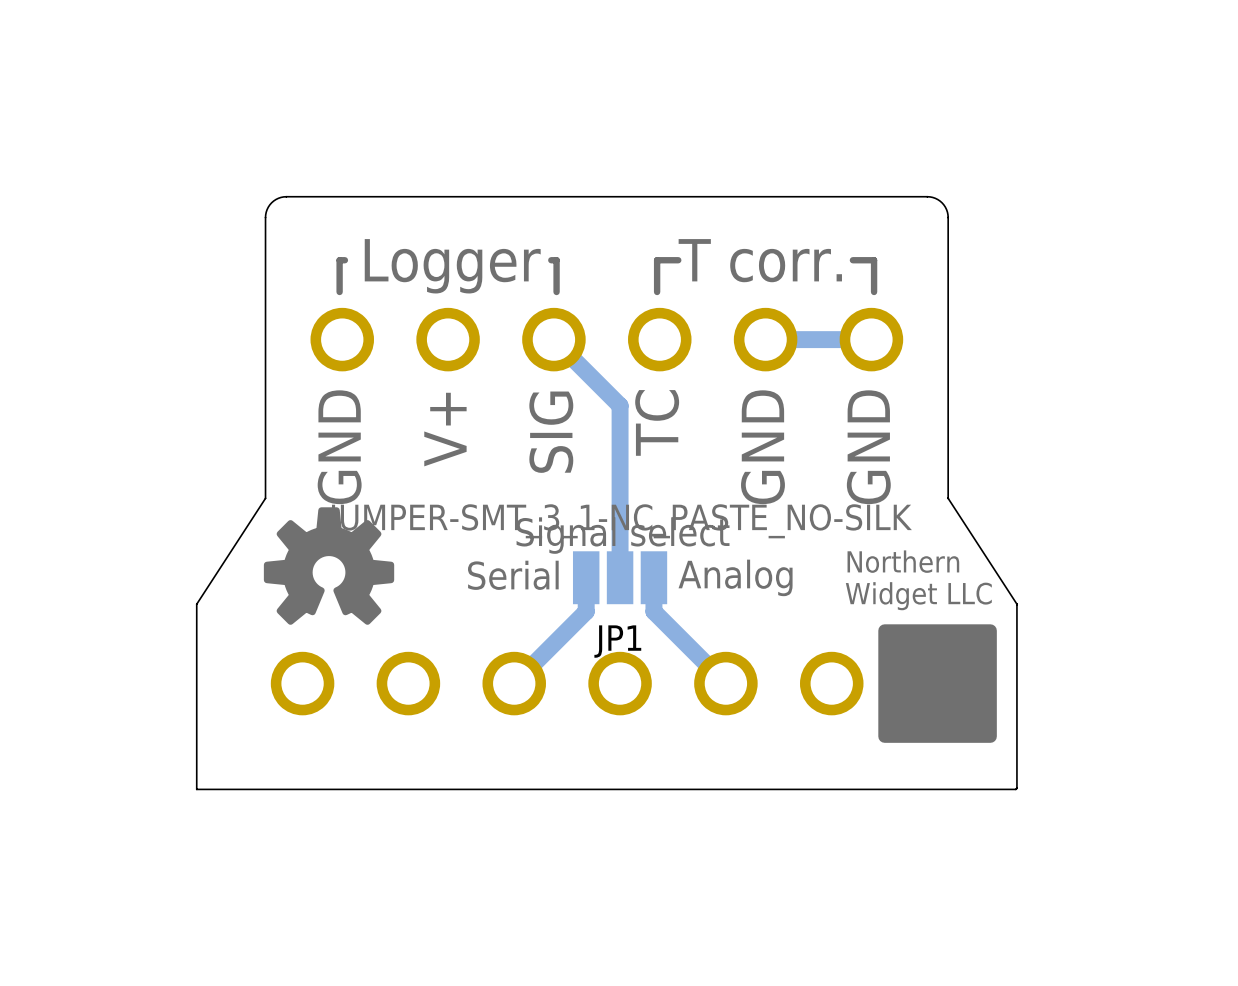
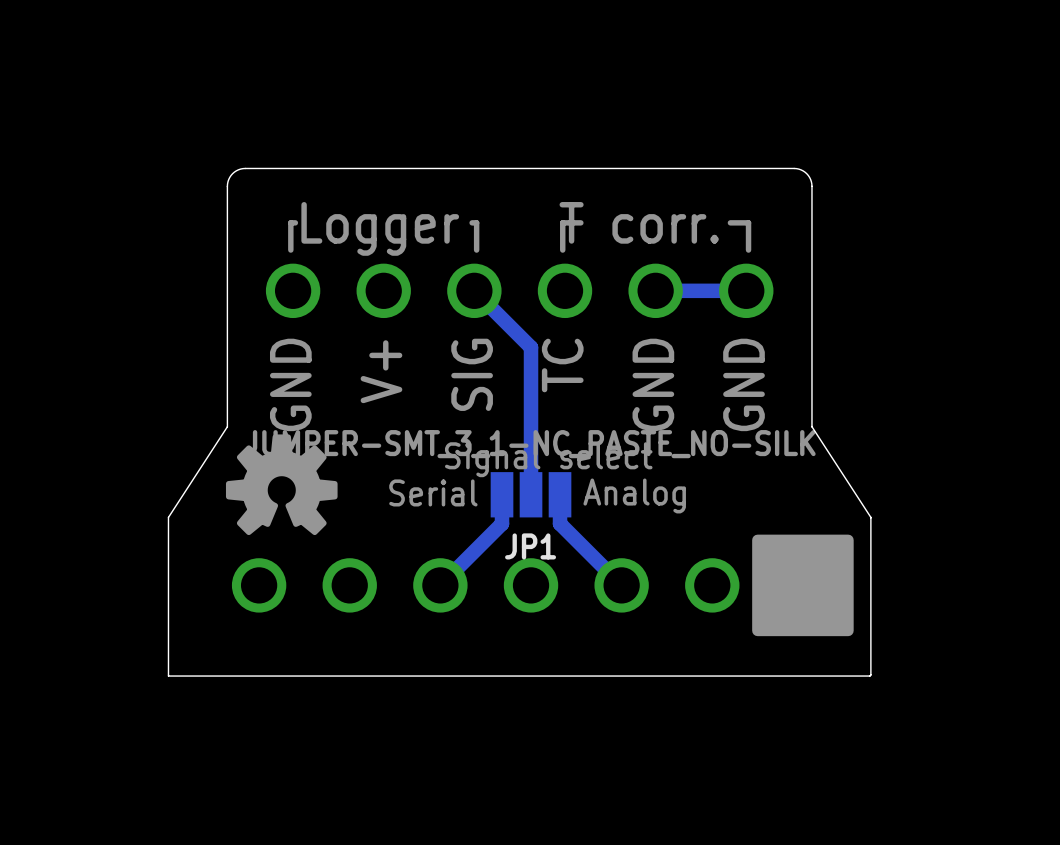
text: Northern (903, 561) -> none
text: Widget LLC (918, 596) -> none

